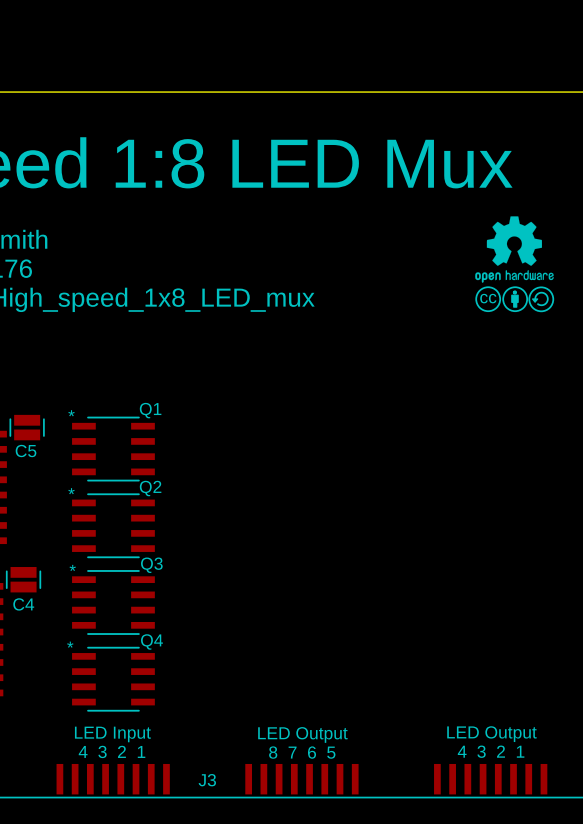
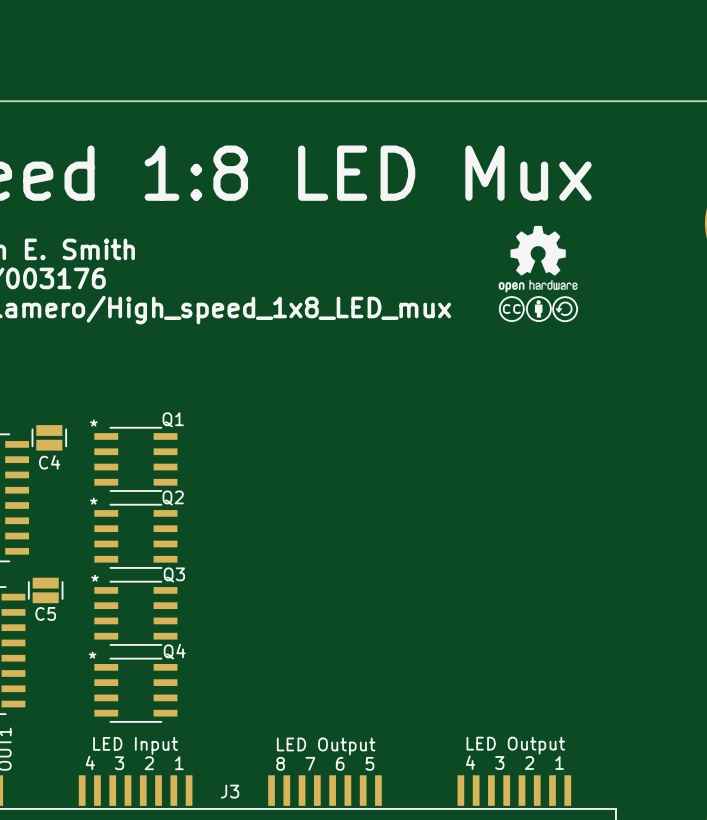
C5 name: C5 (26, 451) -> C4 (49, 462)
C4 name: C4 (23, 604) -> C5 (45, 613)

